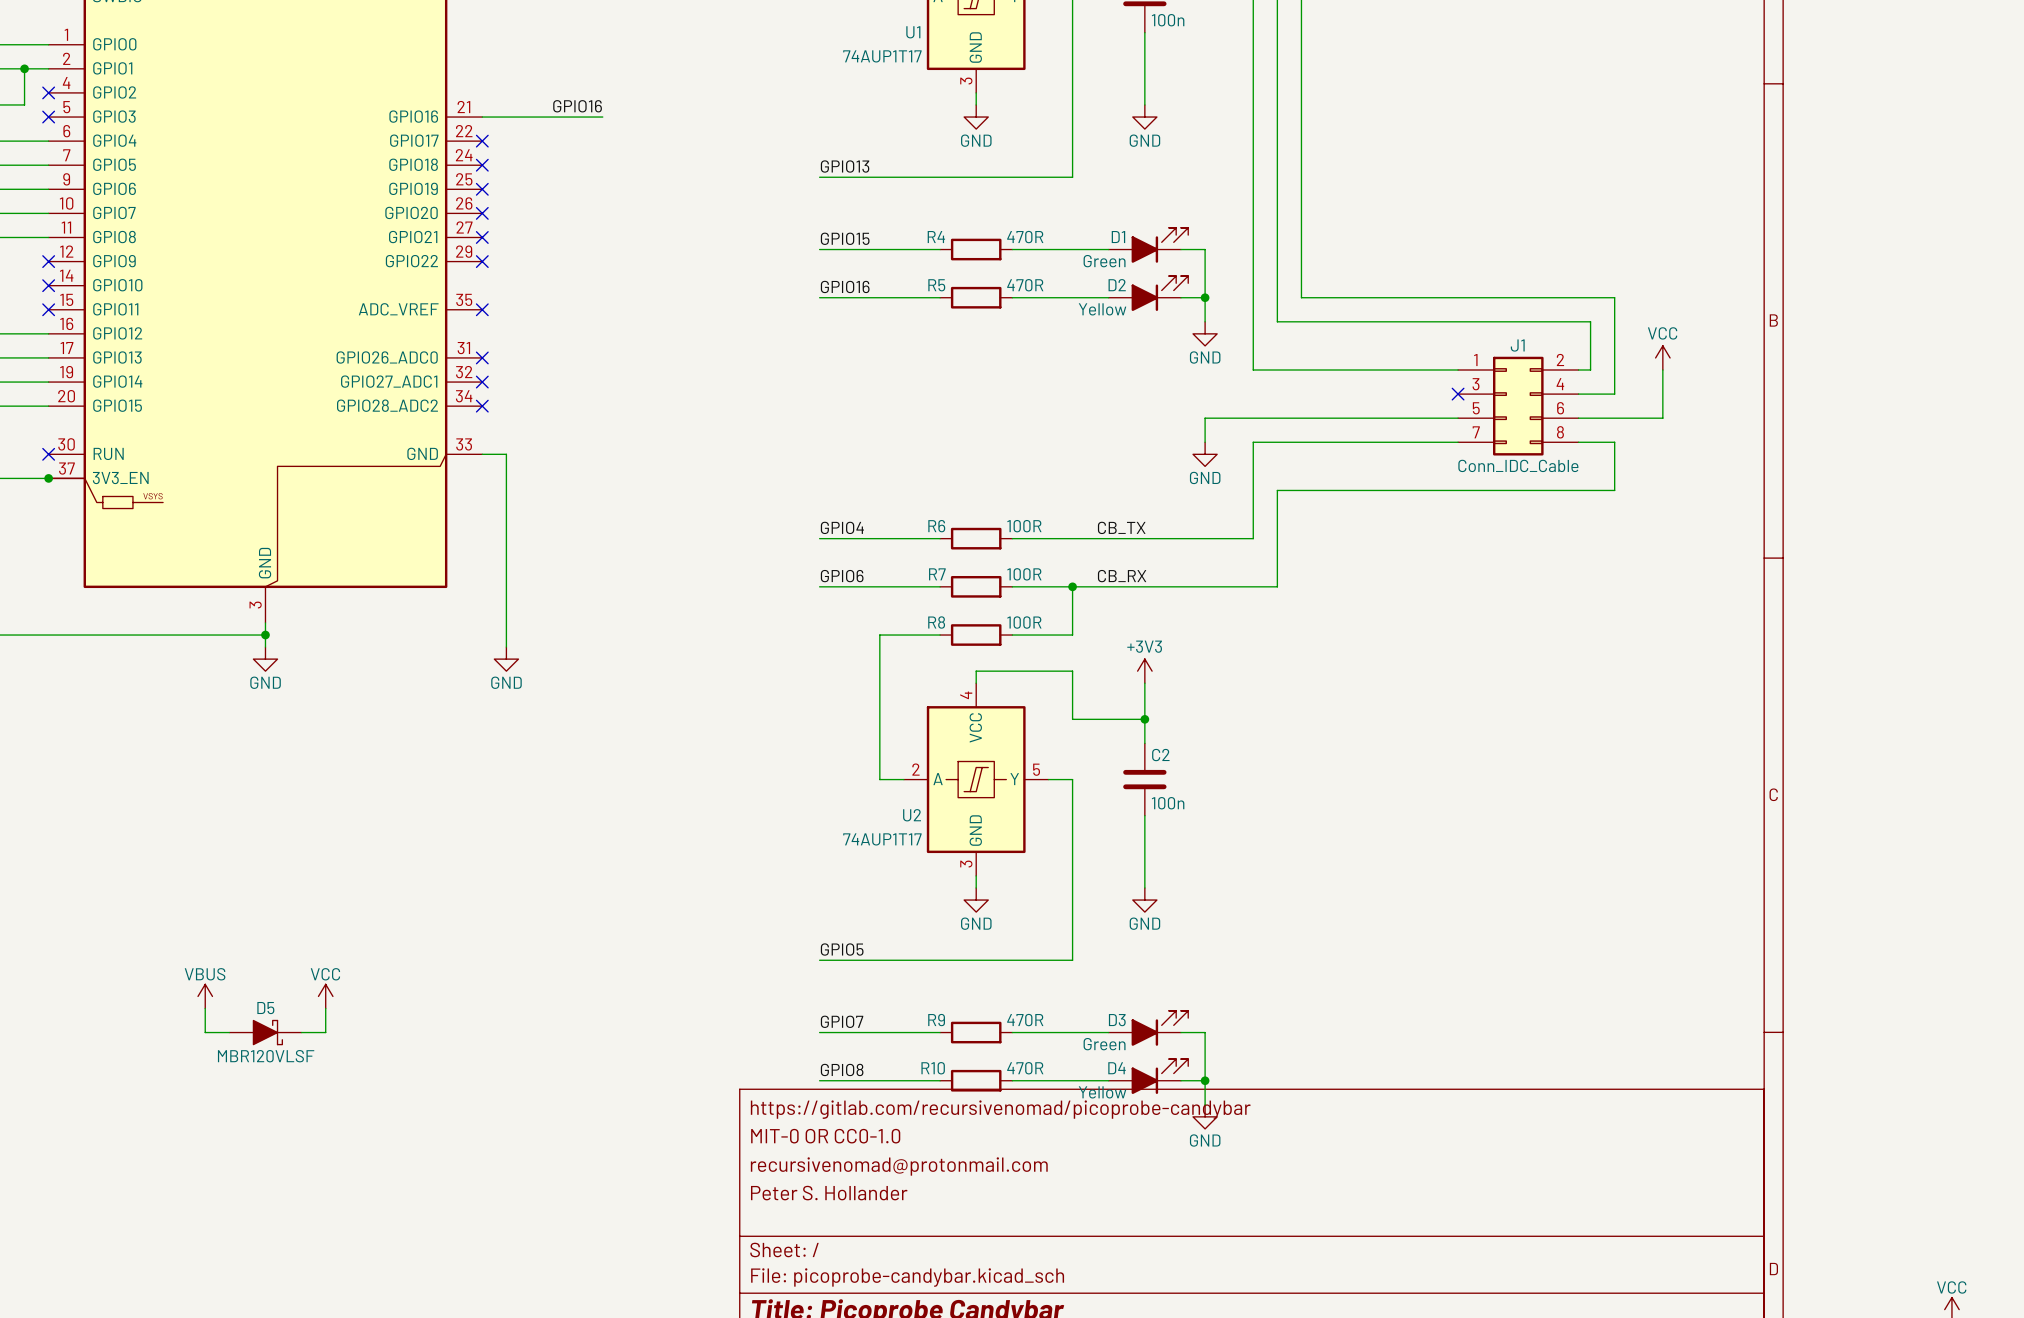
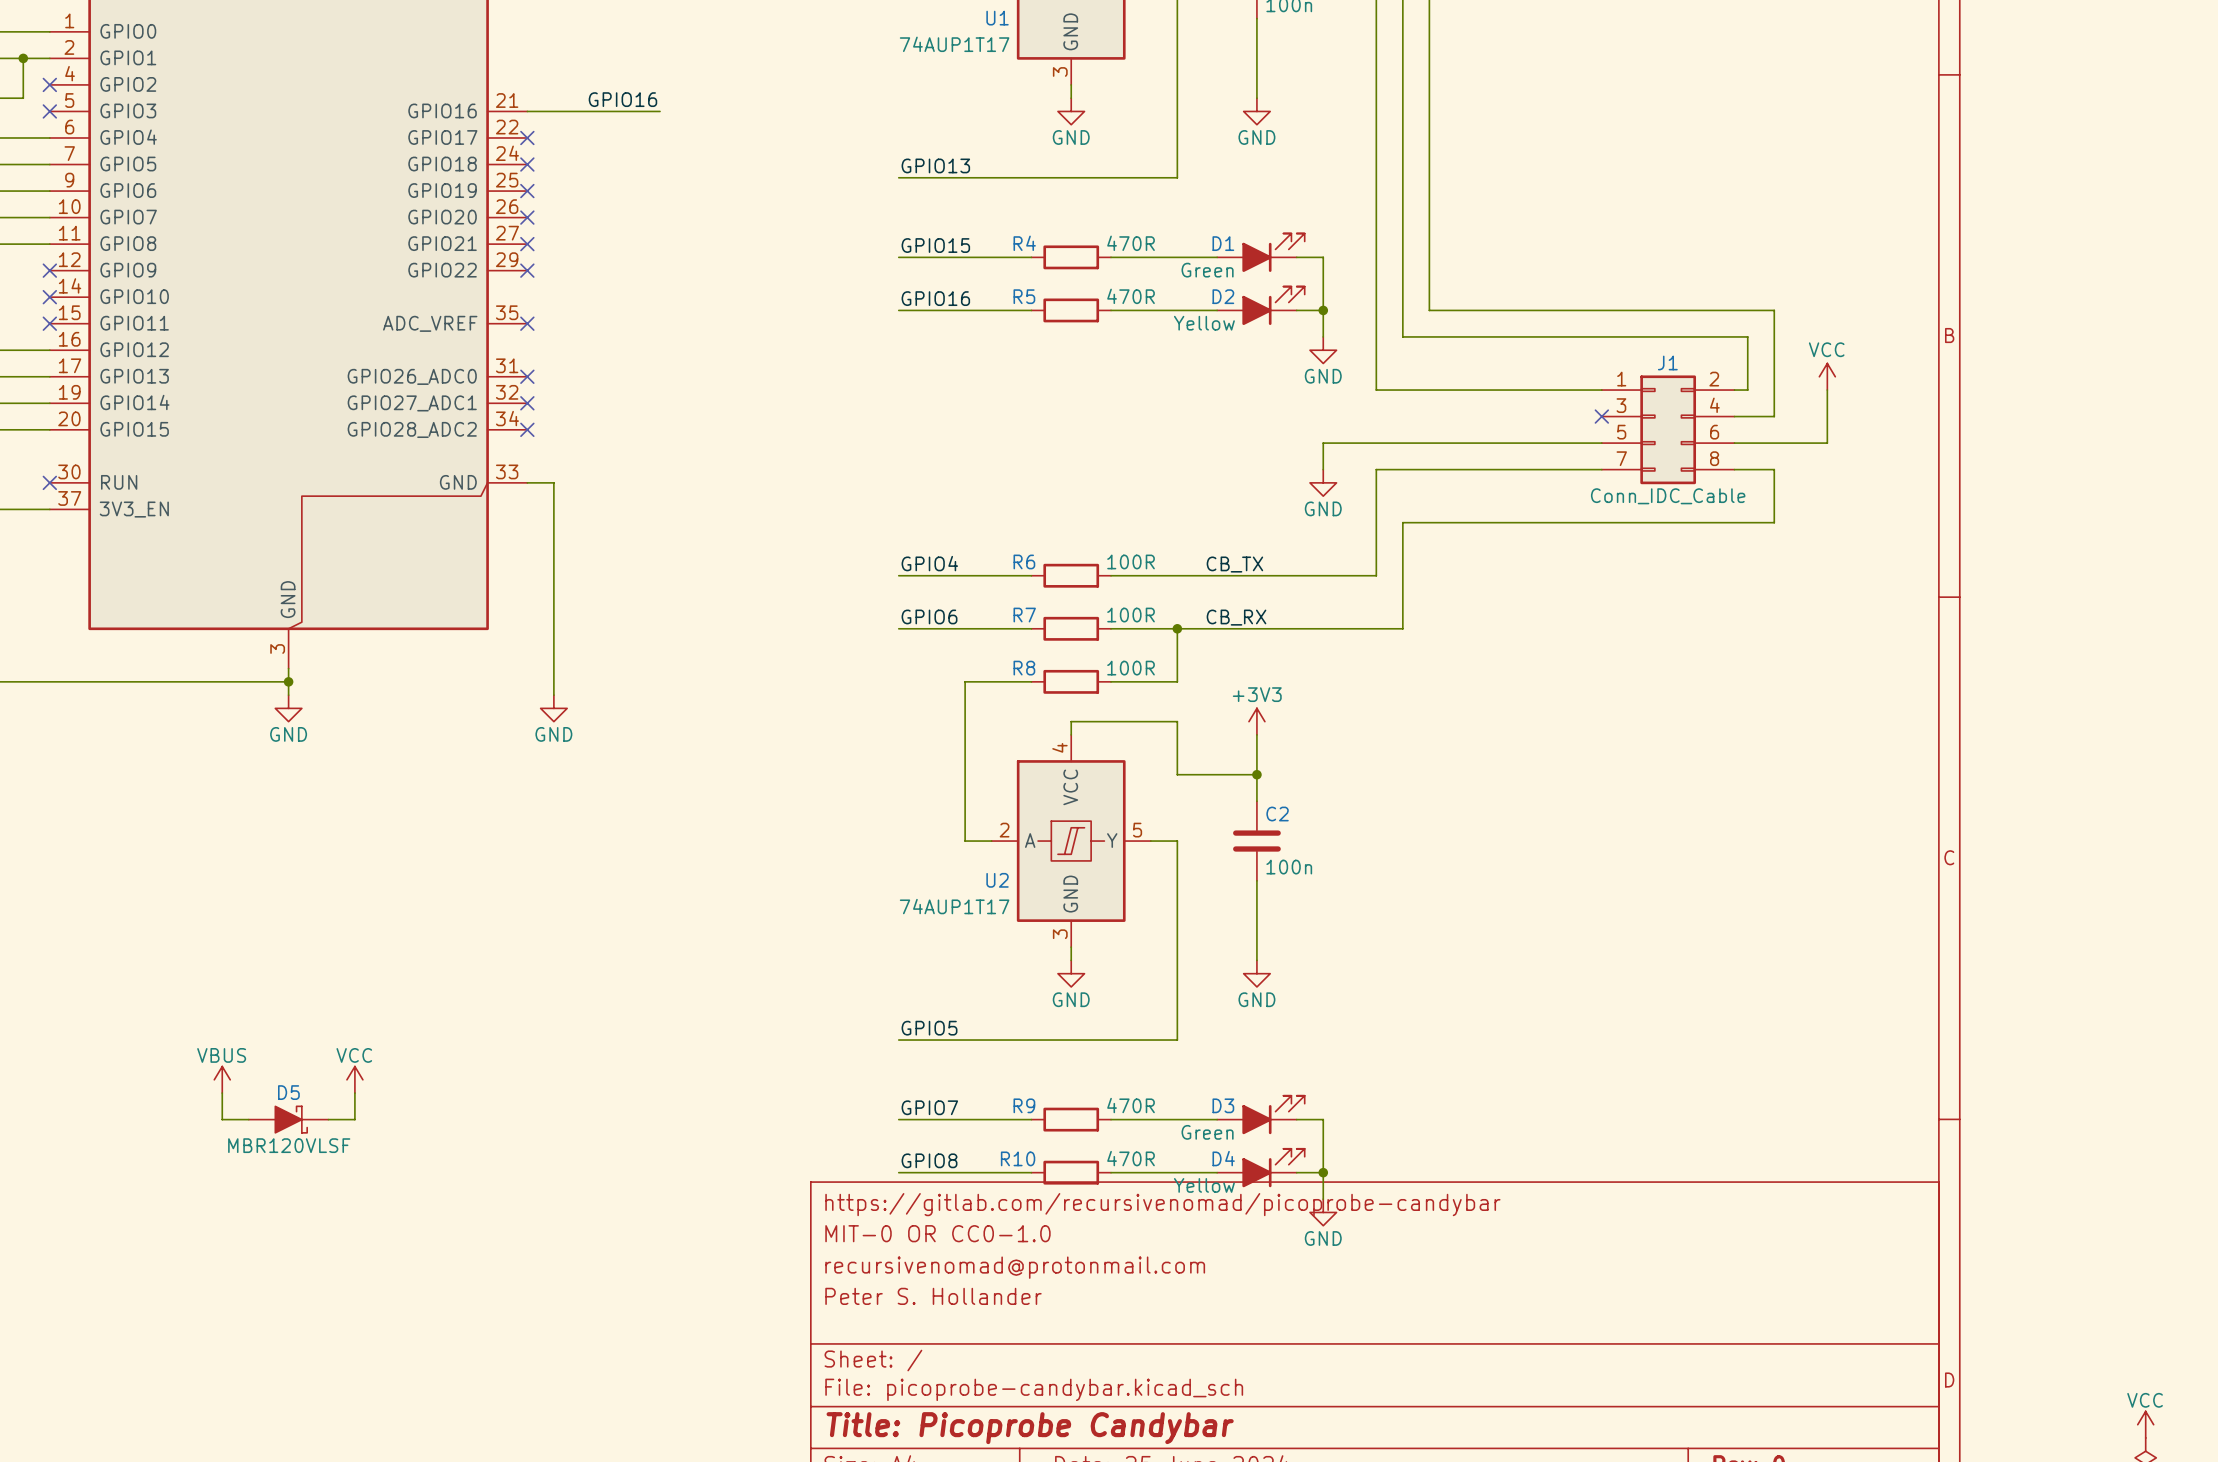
junction: (48, 478) -> none
power symbol: (105, 493) -> none

